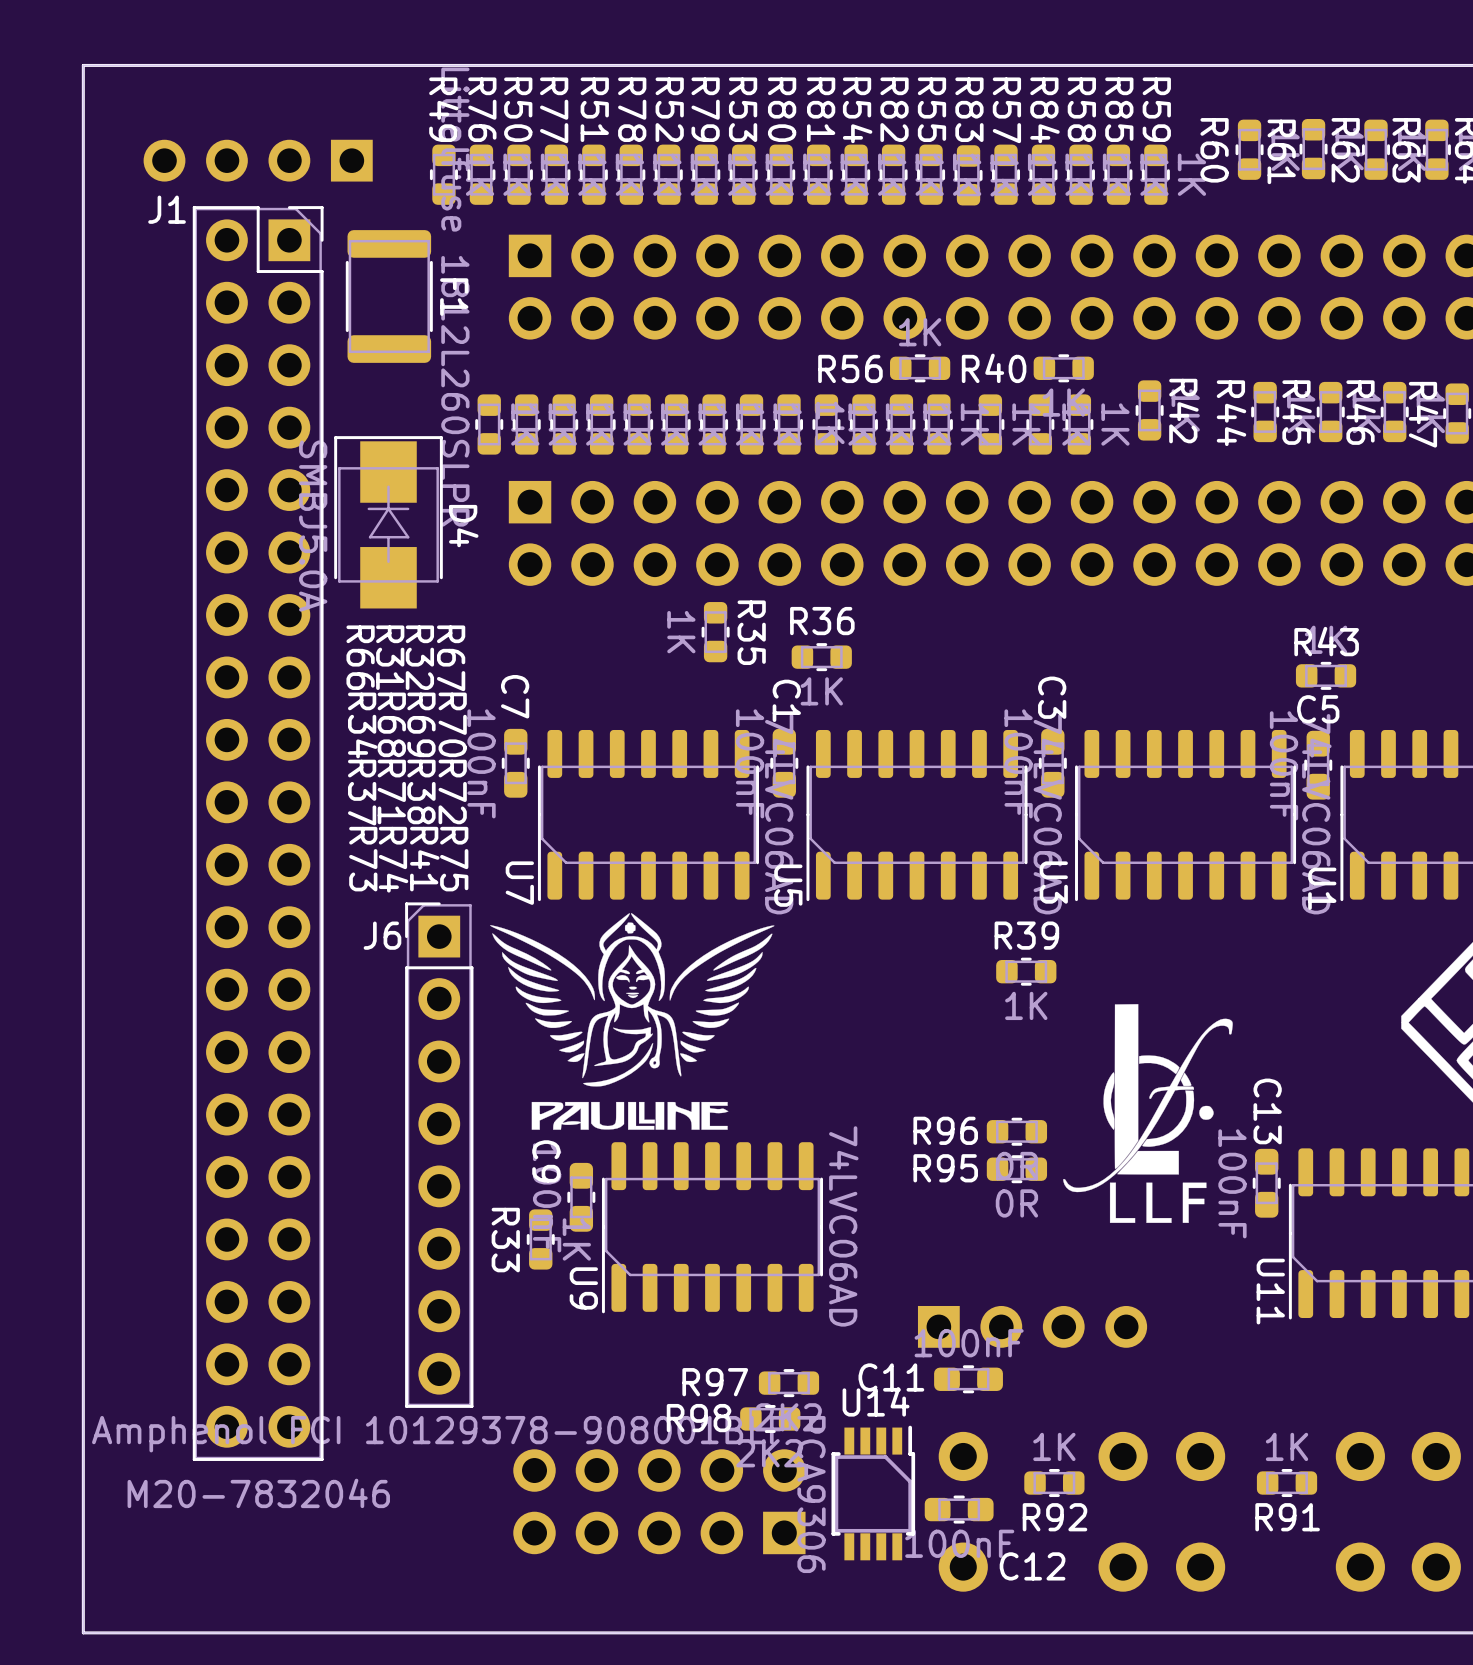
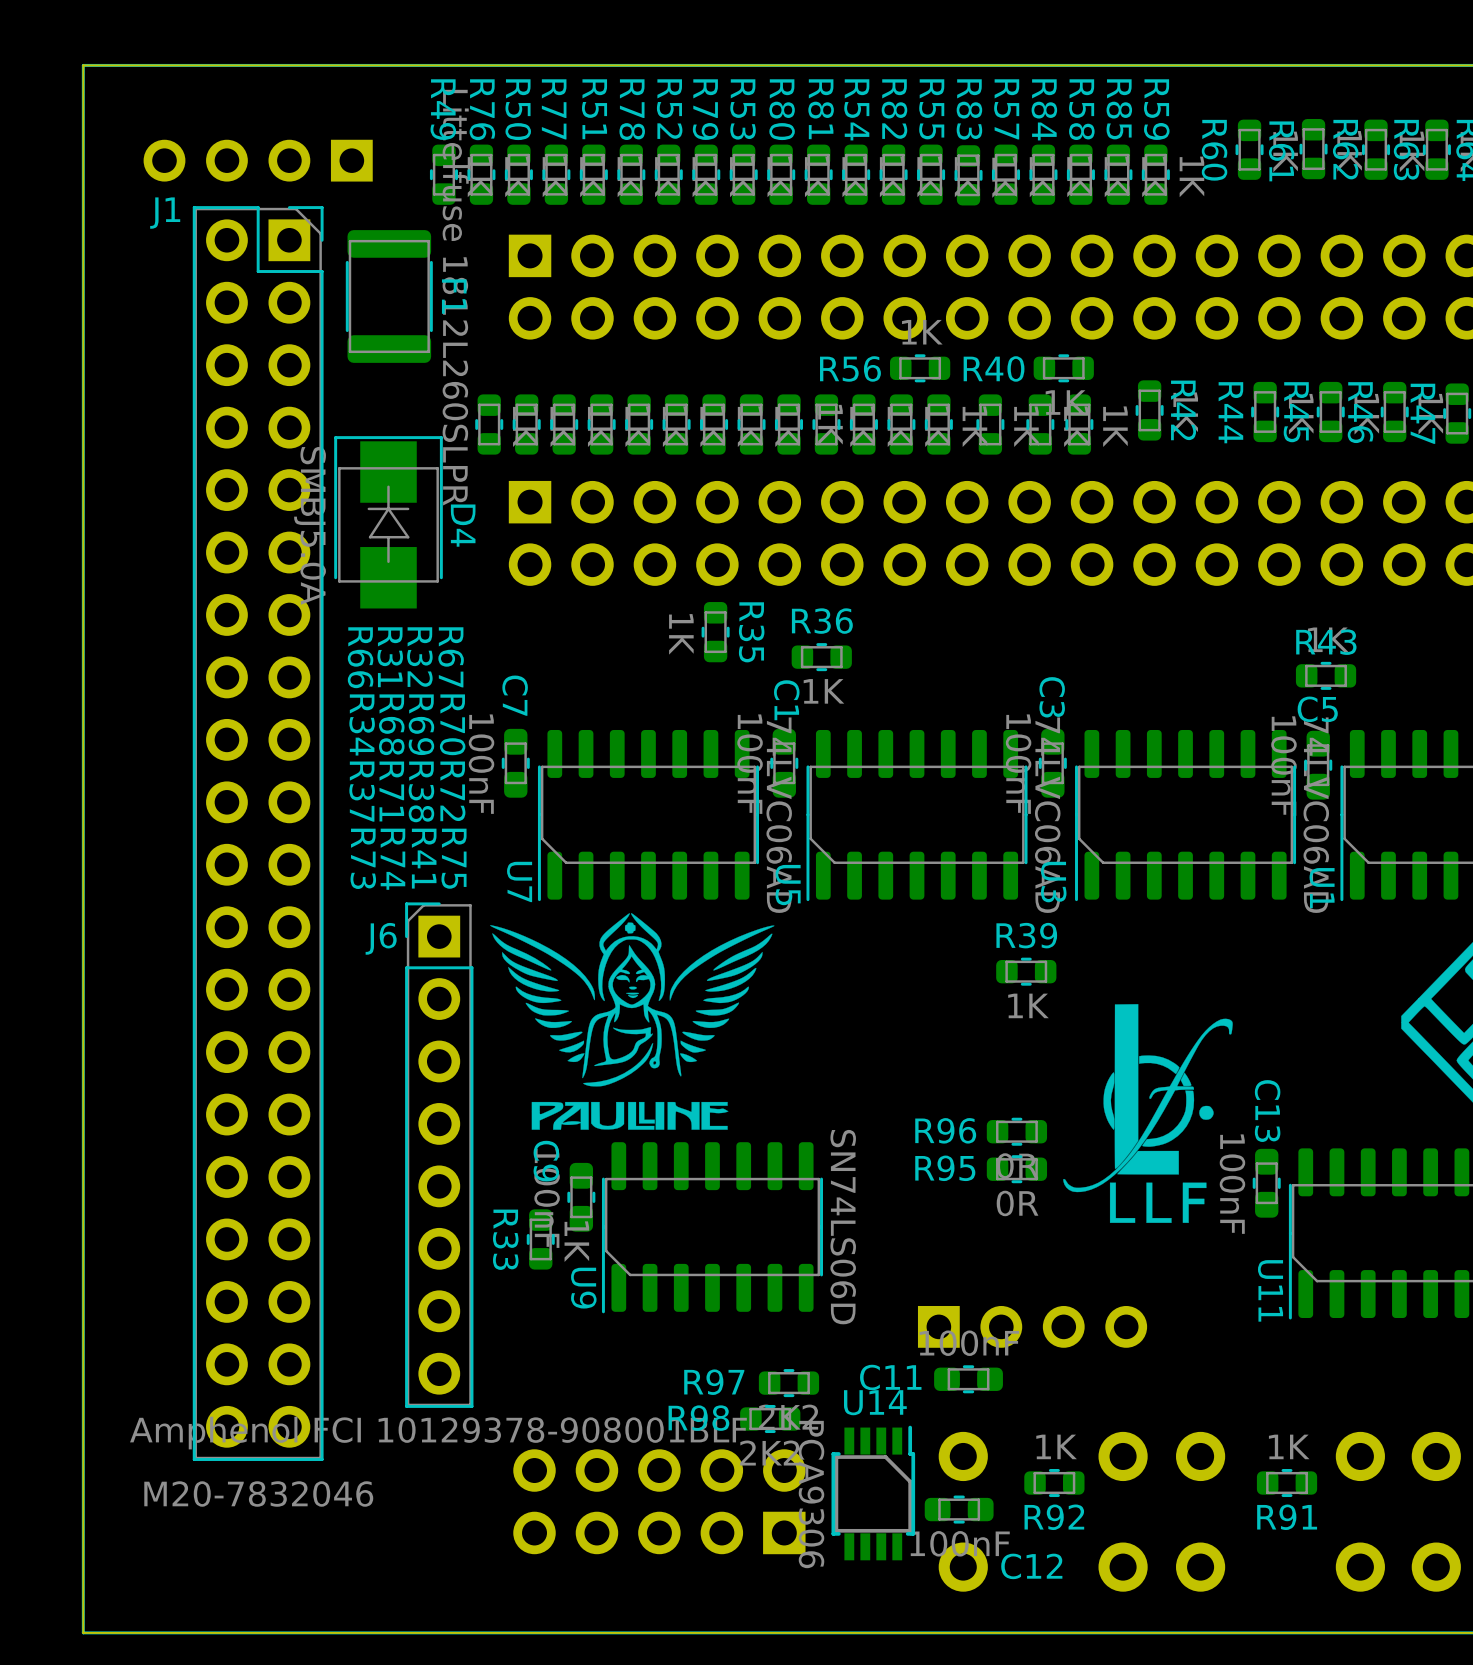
U9 value: 74LVC06AD (843, 1226) -> SN74LS06D (843, 1227)

